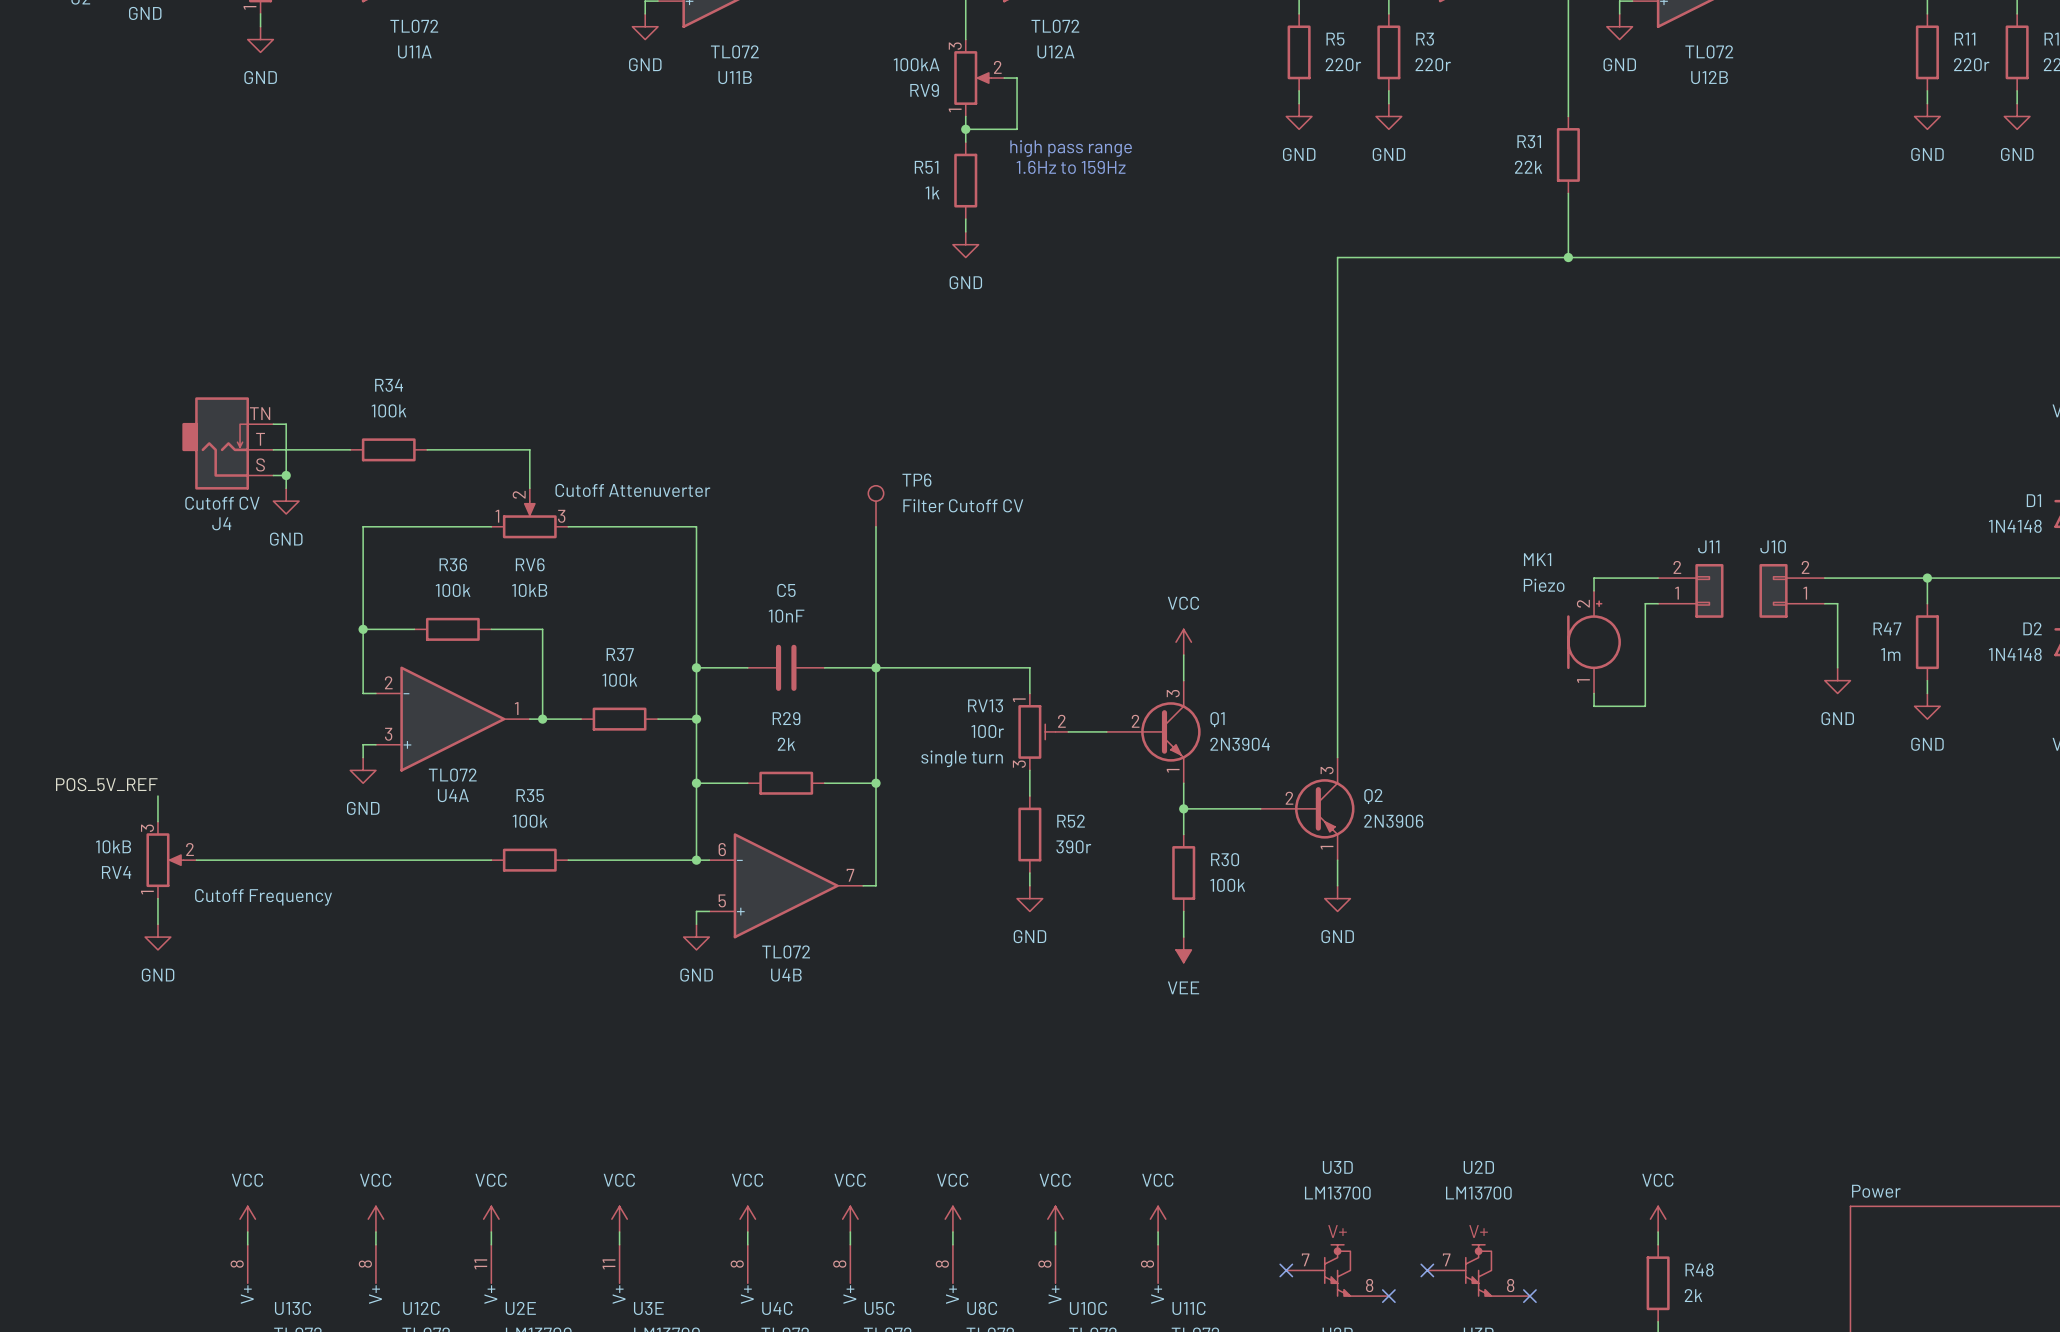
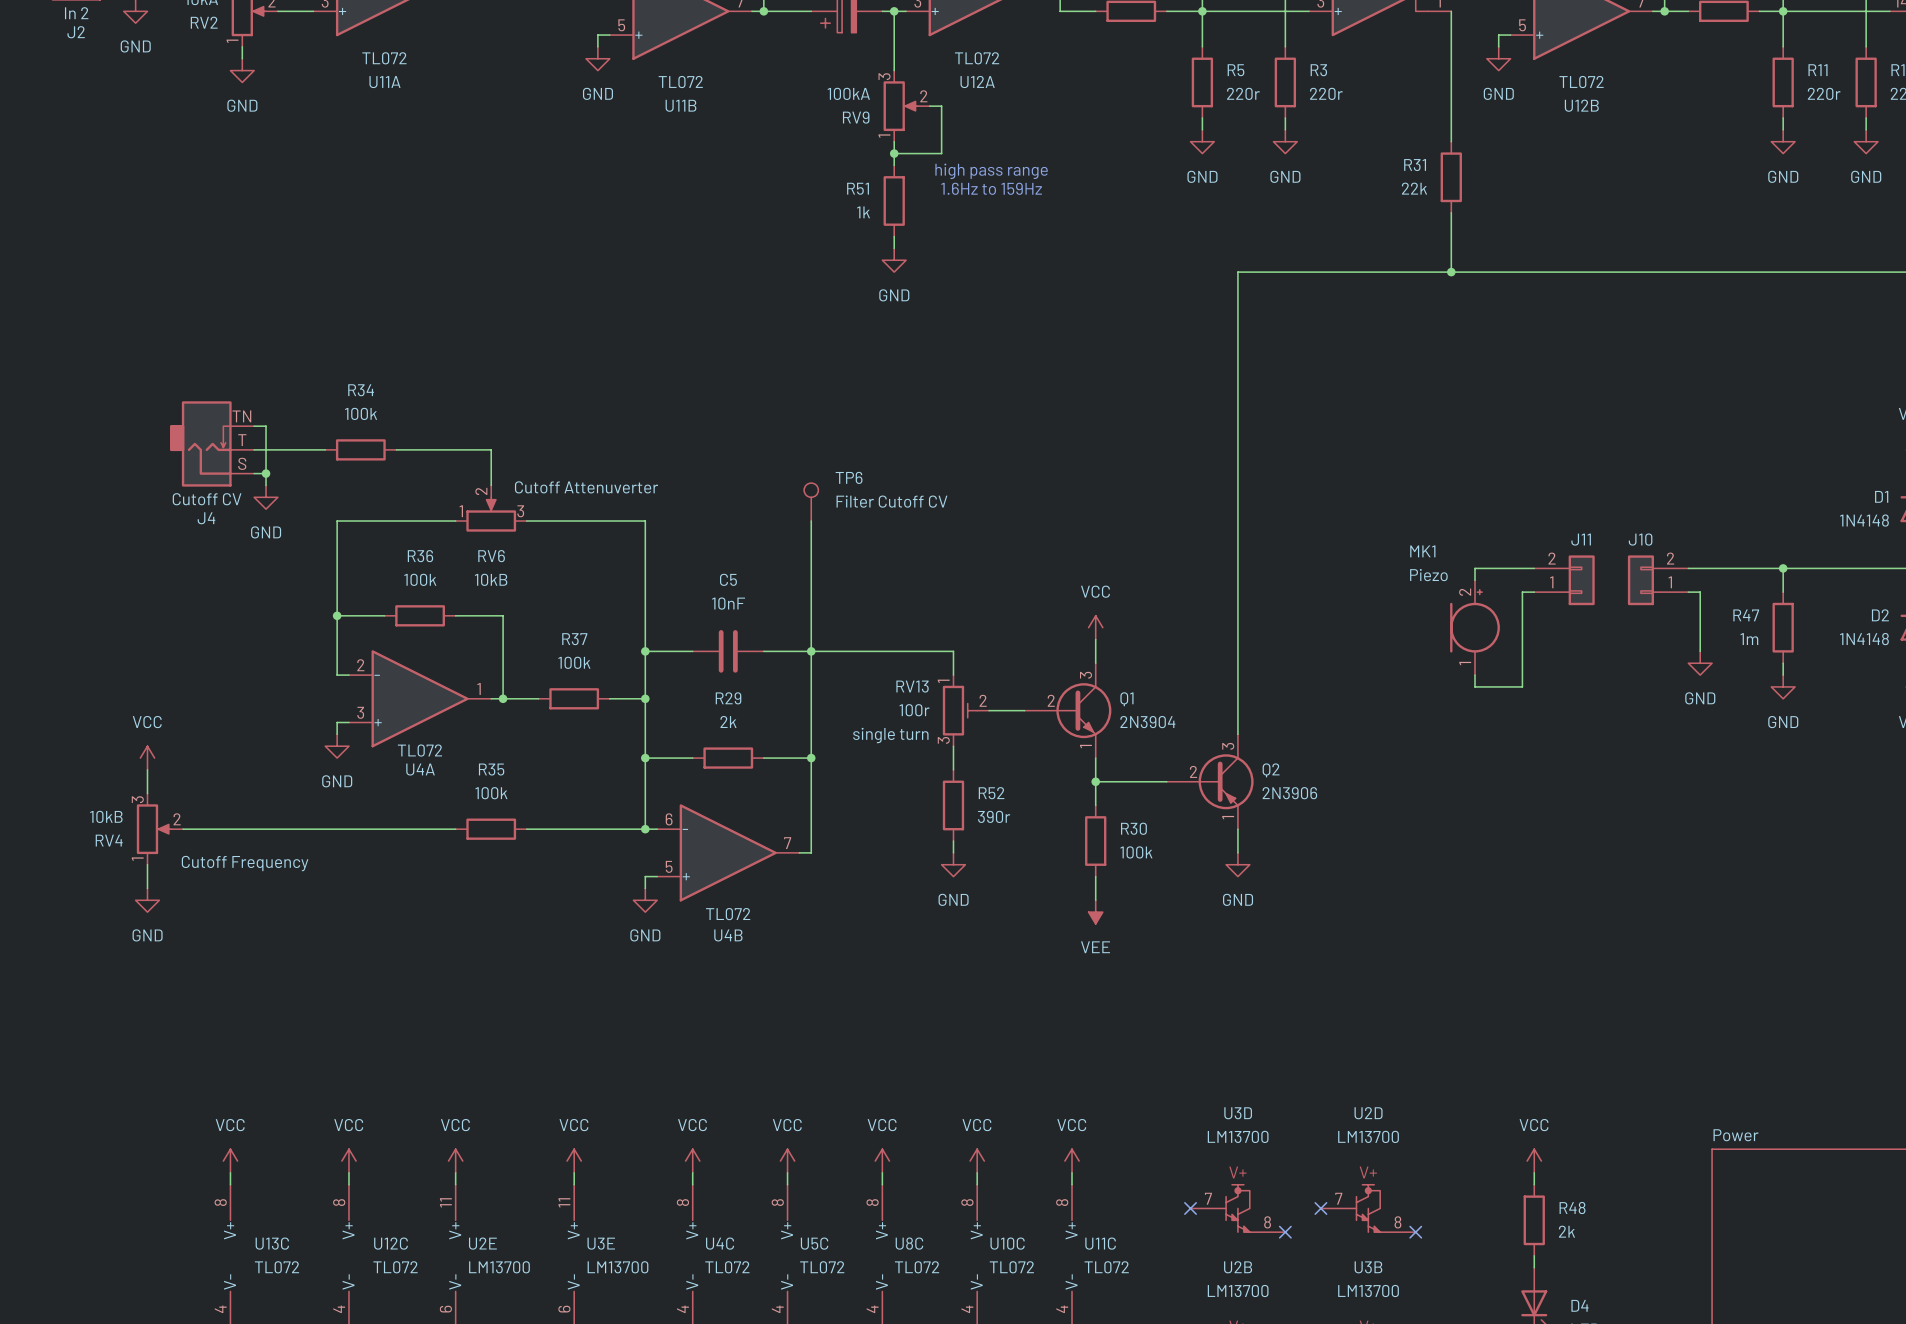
power symbol: none -> VCC (147, 758)
label: POS_5V_REF (106, 784) -> none

